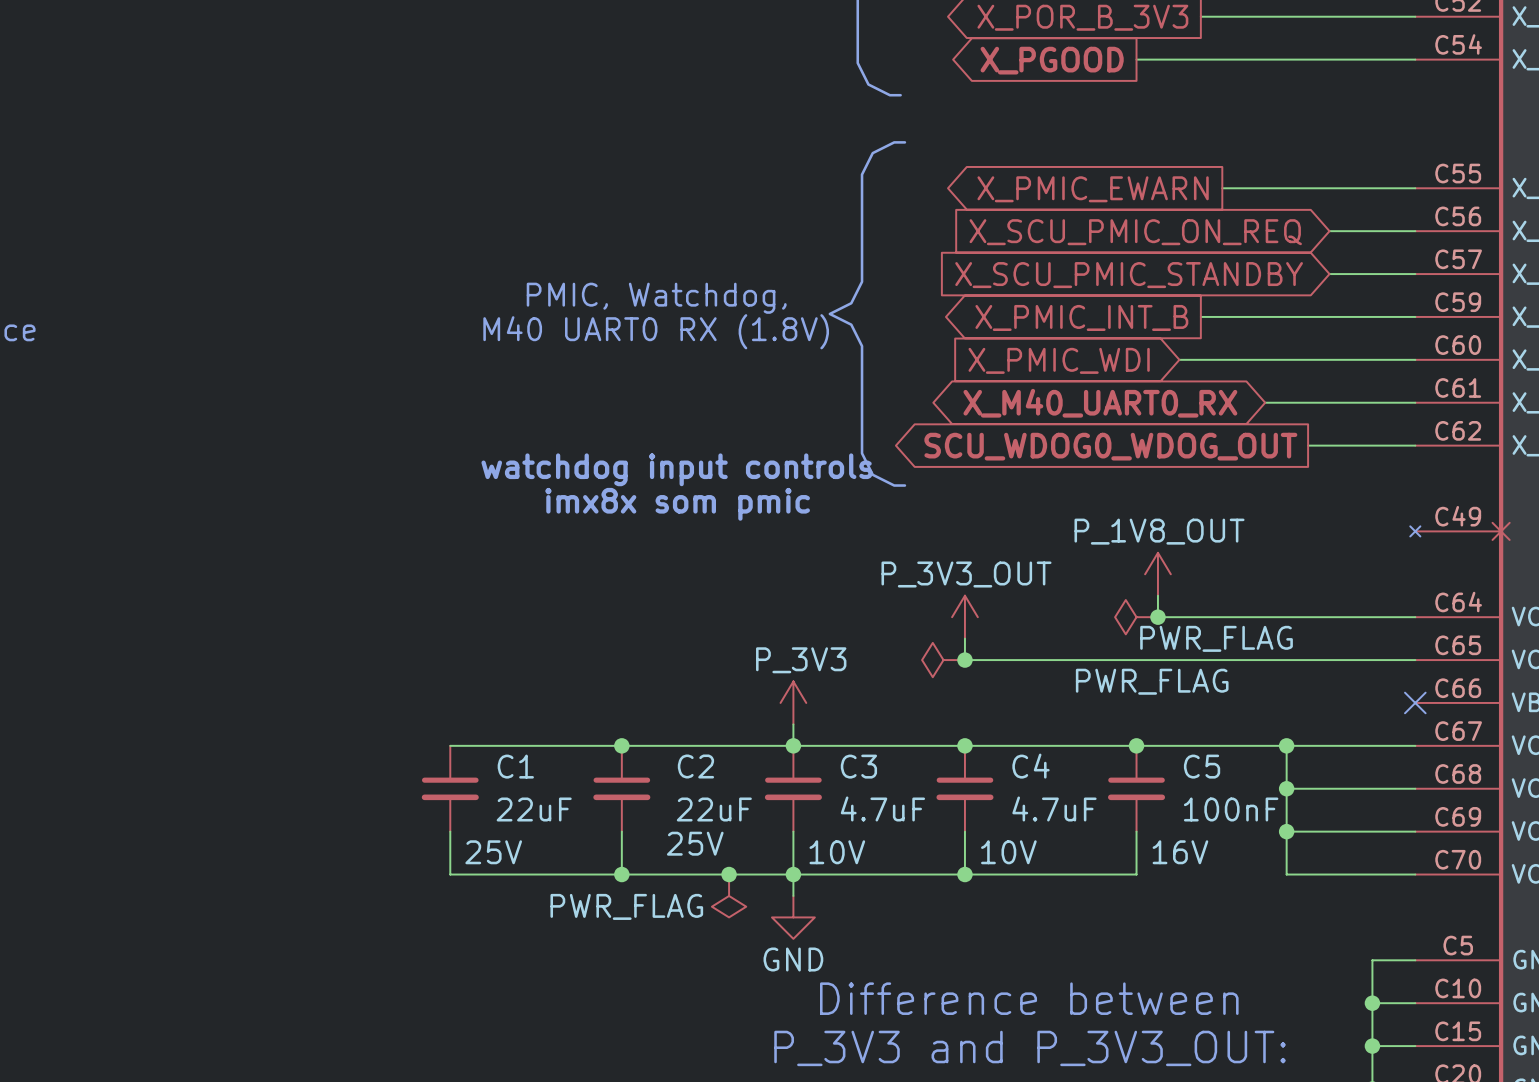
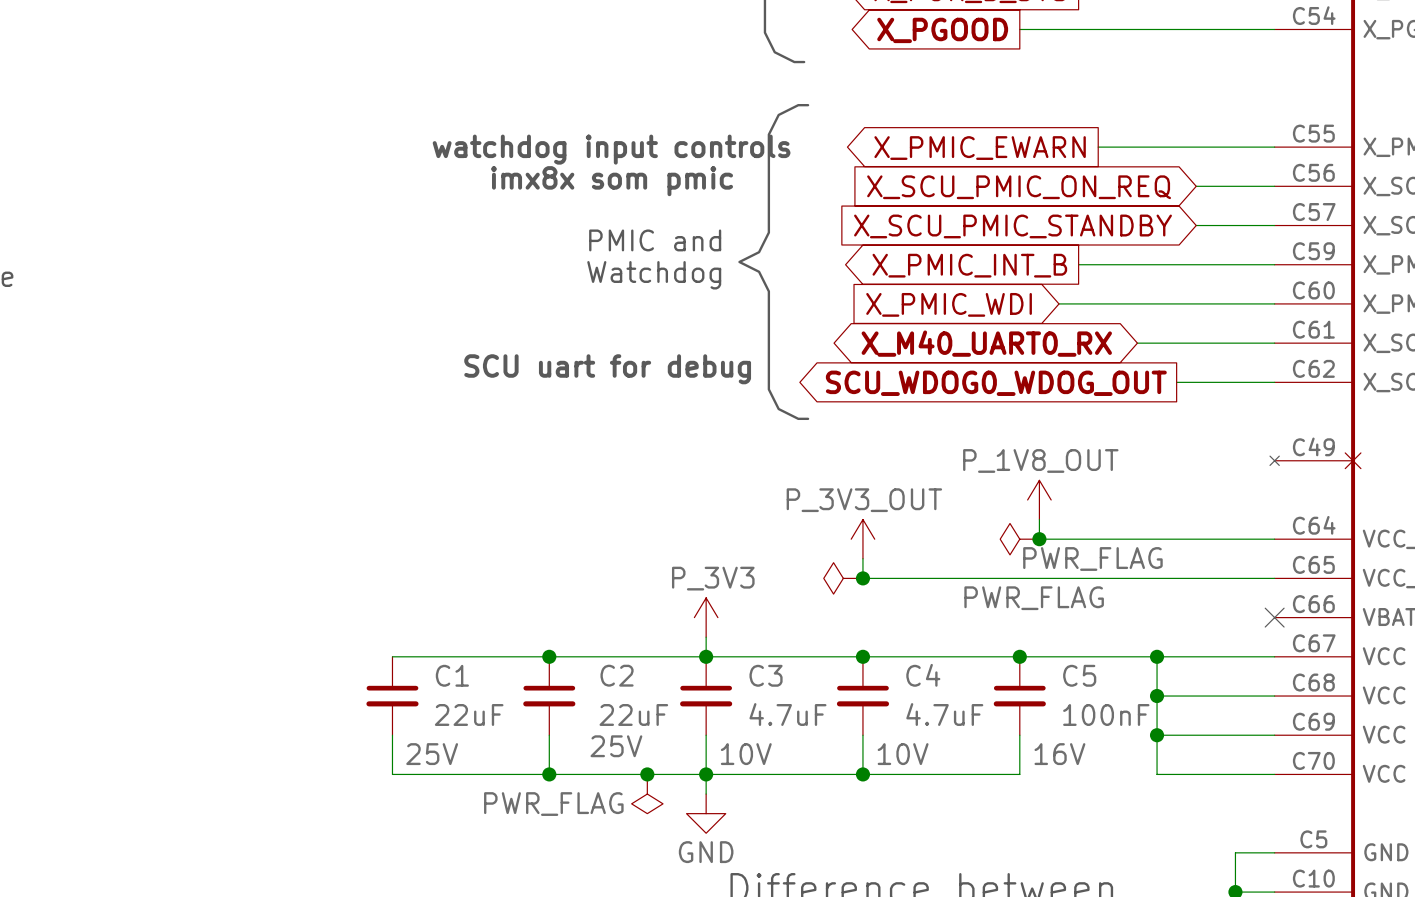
text: none -> PMIC and (655, 240)
text: PMIC, Watchdog, (656, 298) -> none
text: none -> Watchdog (654, 275)
text: M40 UART0 RX (1.8V) (656, 331) -> none
text: none -> SCU uart for debug (607, 369)
text position: watchdog input controls (677, 469) -> watchdog input controls (611, 149)
text position: imx8x som pmic (677, 504) -> imx8x som pmic (612, 181)

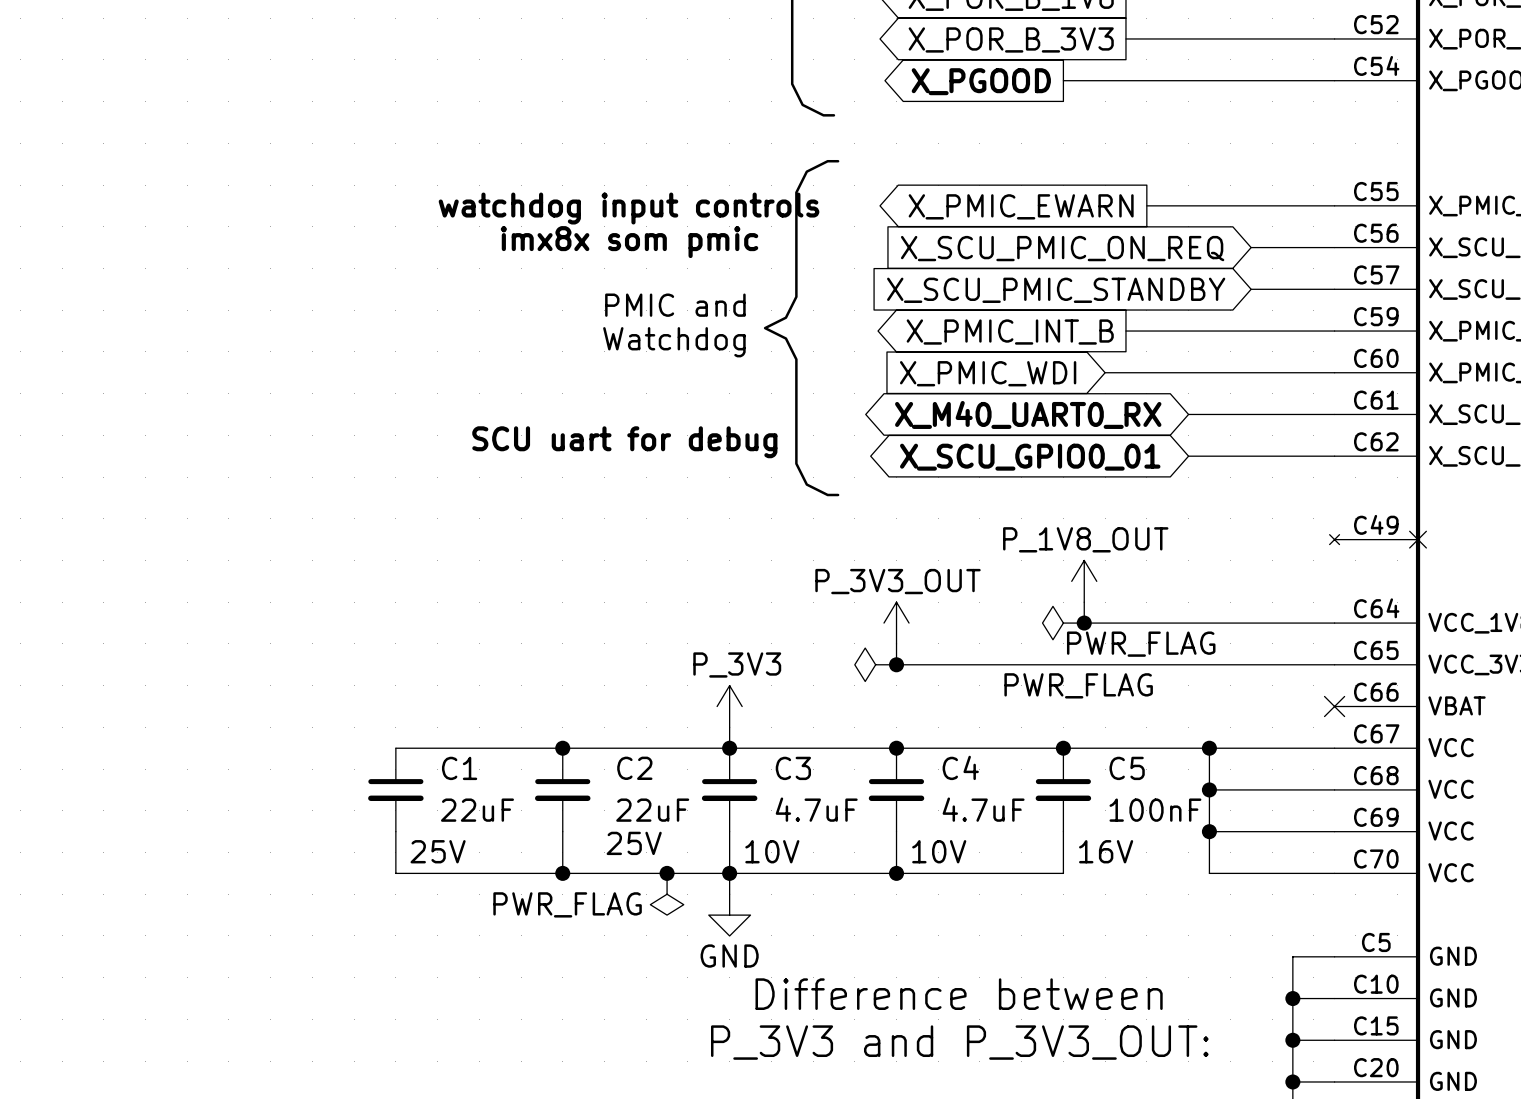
wire: none -> (1188, 456) (1230, 456)
global label: none -> X_SCU_GPIO0_01 (1030, 457)
global label: SCU_WDOG0_WDOG_OUT (996, 383) -> none

